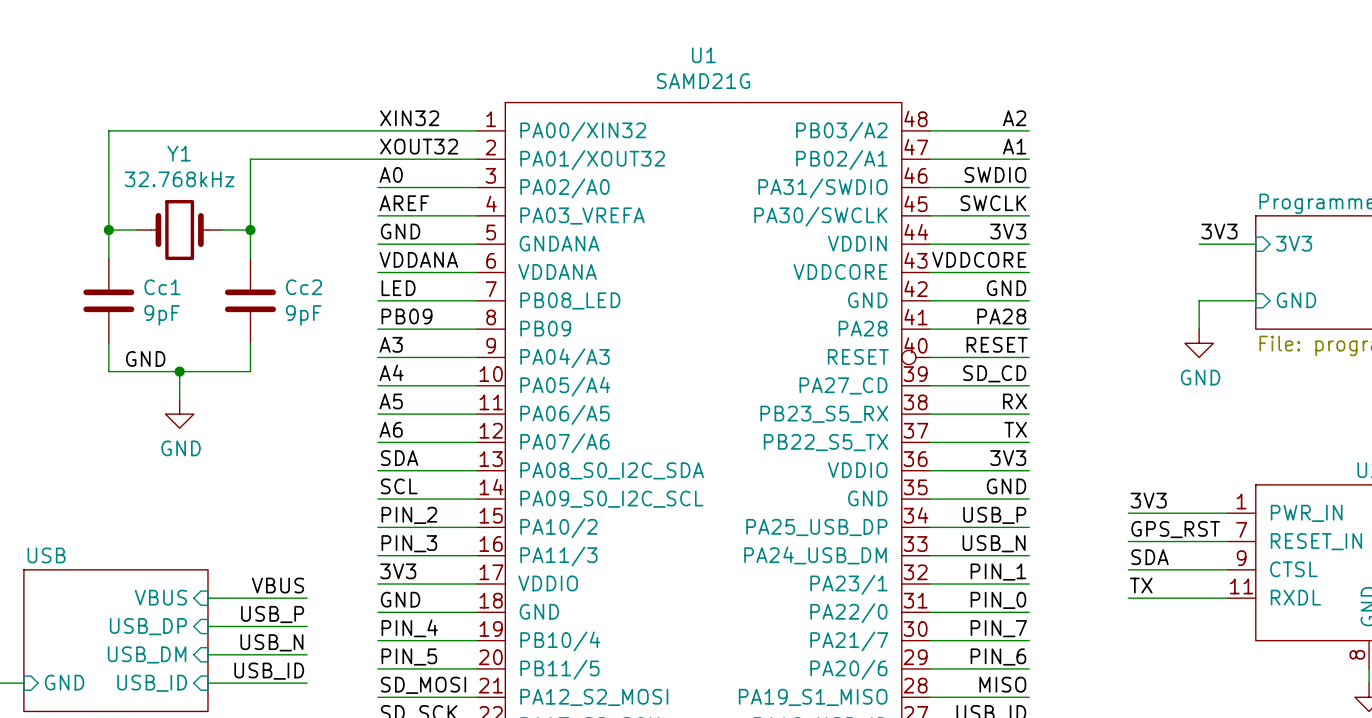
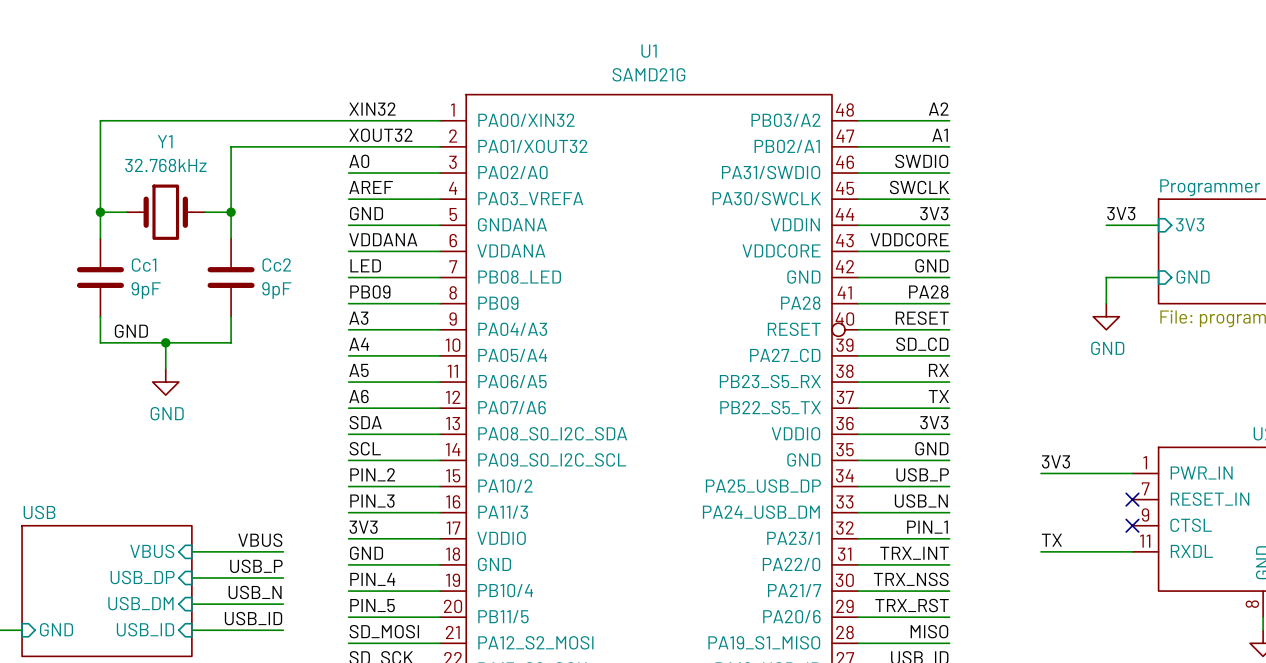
label: GPS_RST (1175, 529) -> none
wire: (1128, 541) (1227, 541) -> none
no-connect mark: none -> (1132, 499)
label: SDA (1150, 557) -> none
wire: (1128, 569) (1227, 569) -> none
no-connect mark: none -> (1132, 525)
label: PIN_0 (998, 600) -> TRX_INT (914, 553)
label: PIN_7 (998, 628) -> TRX_NSS (911, 579)
label: PIN_6 (998, 657) -> TRX_RST (912, 605)

